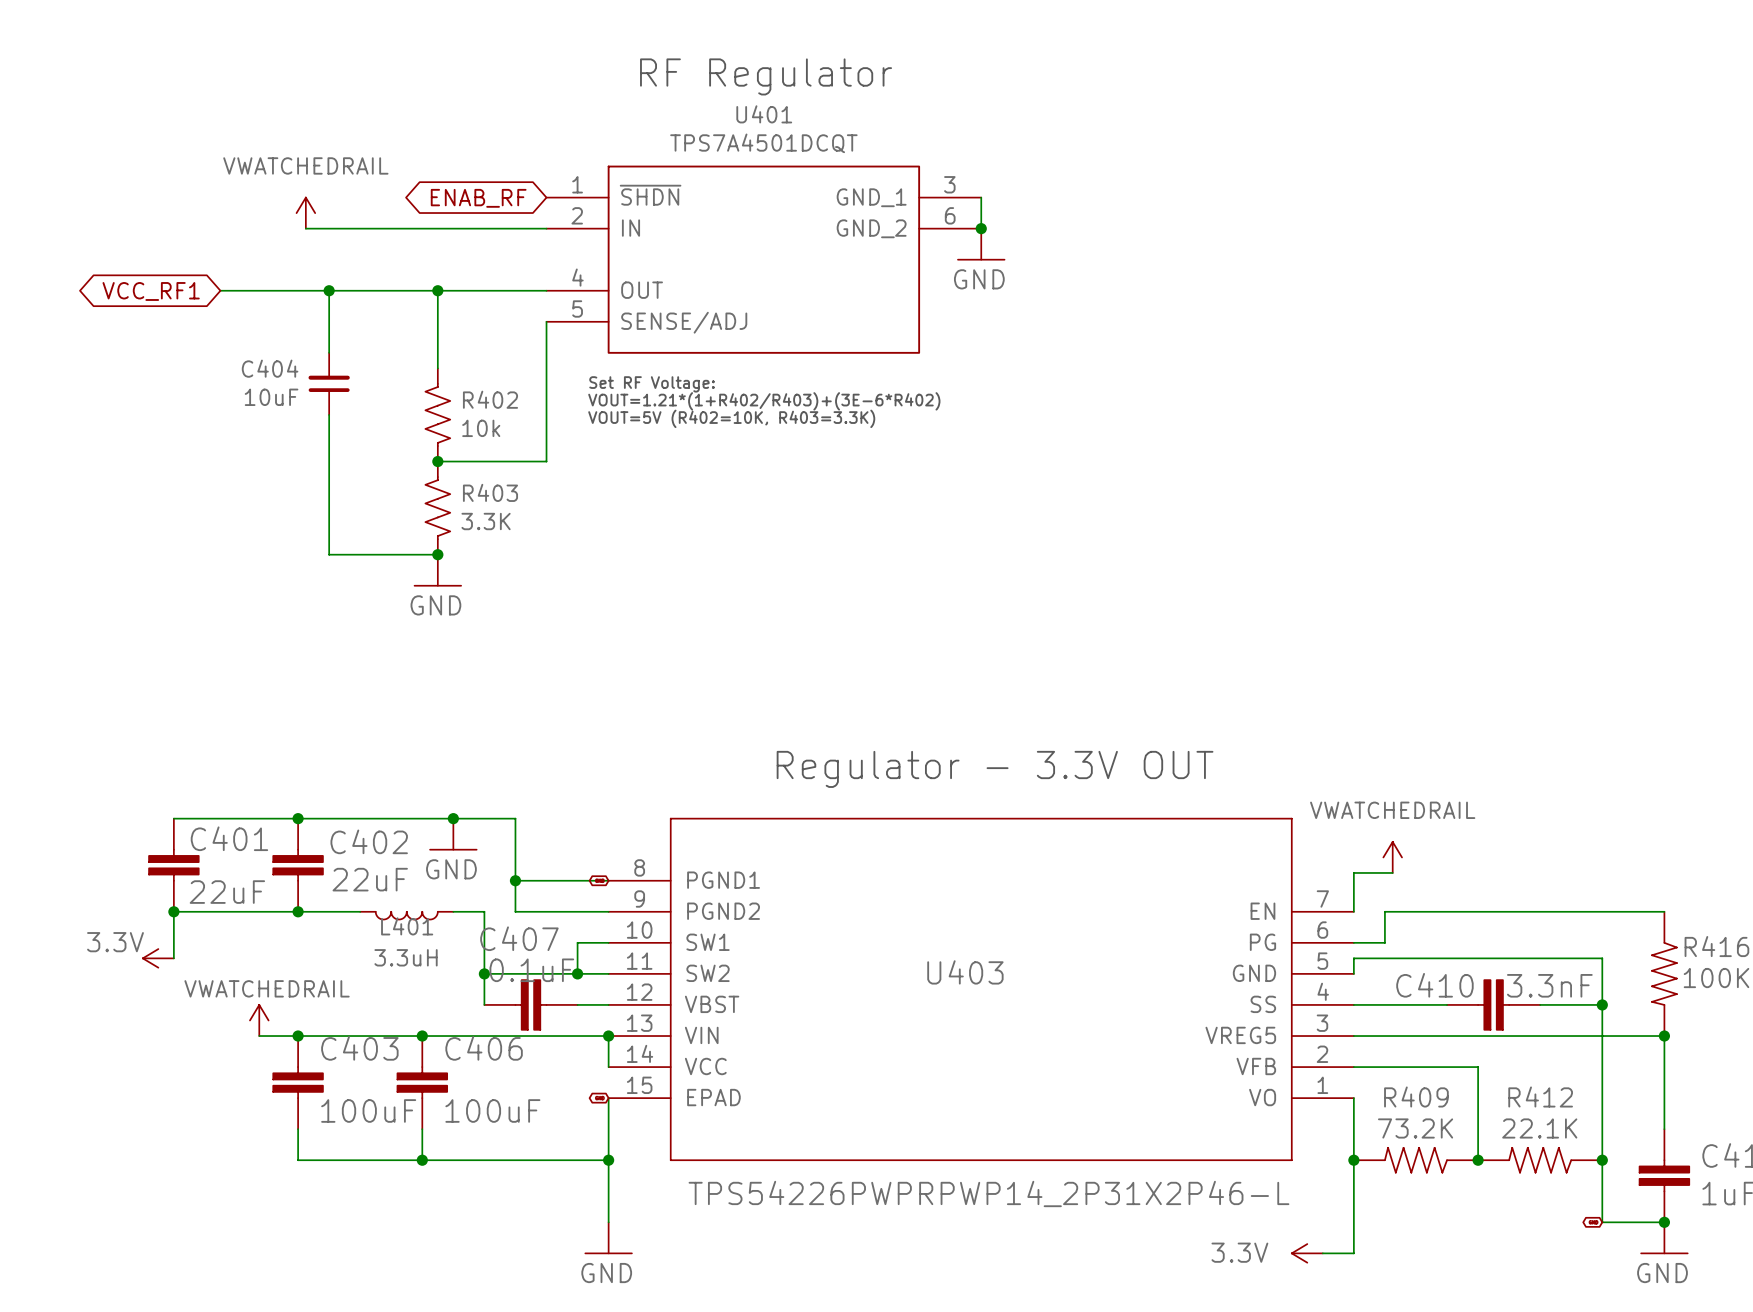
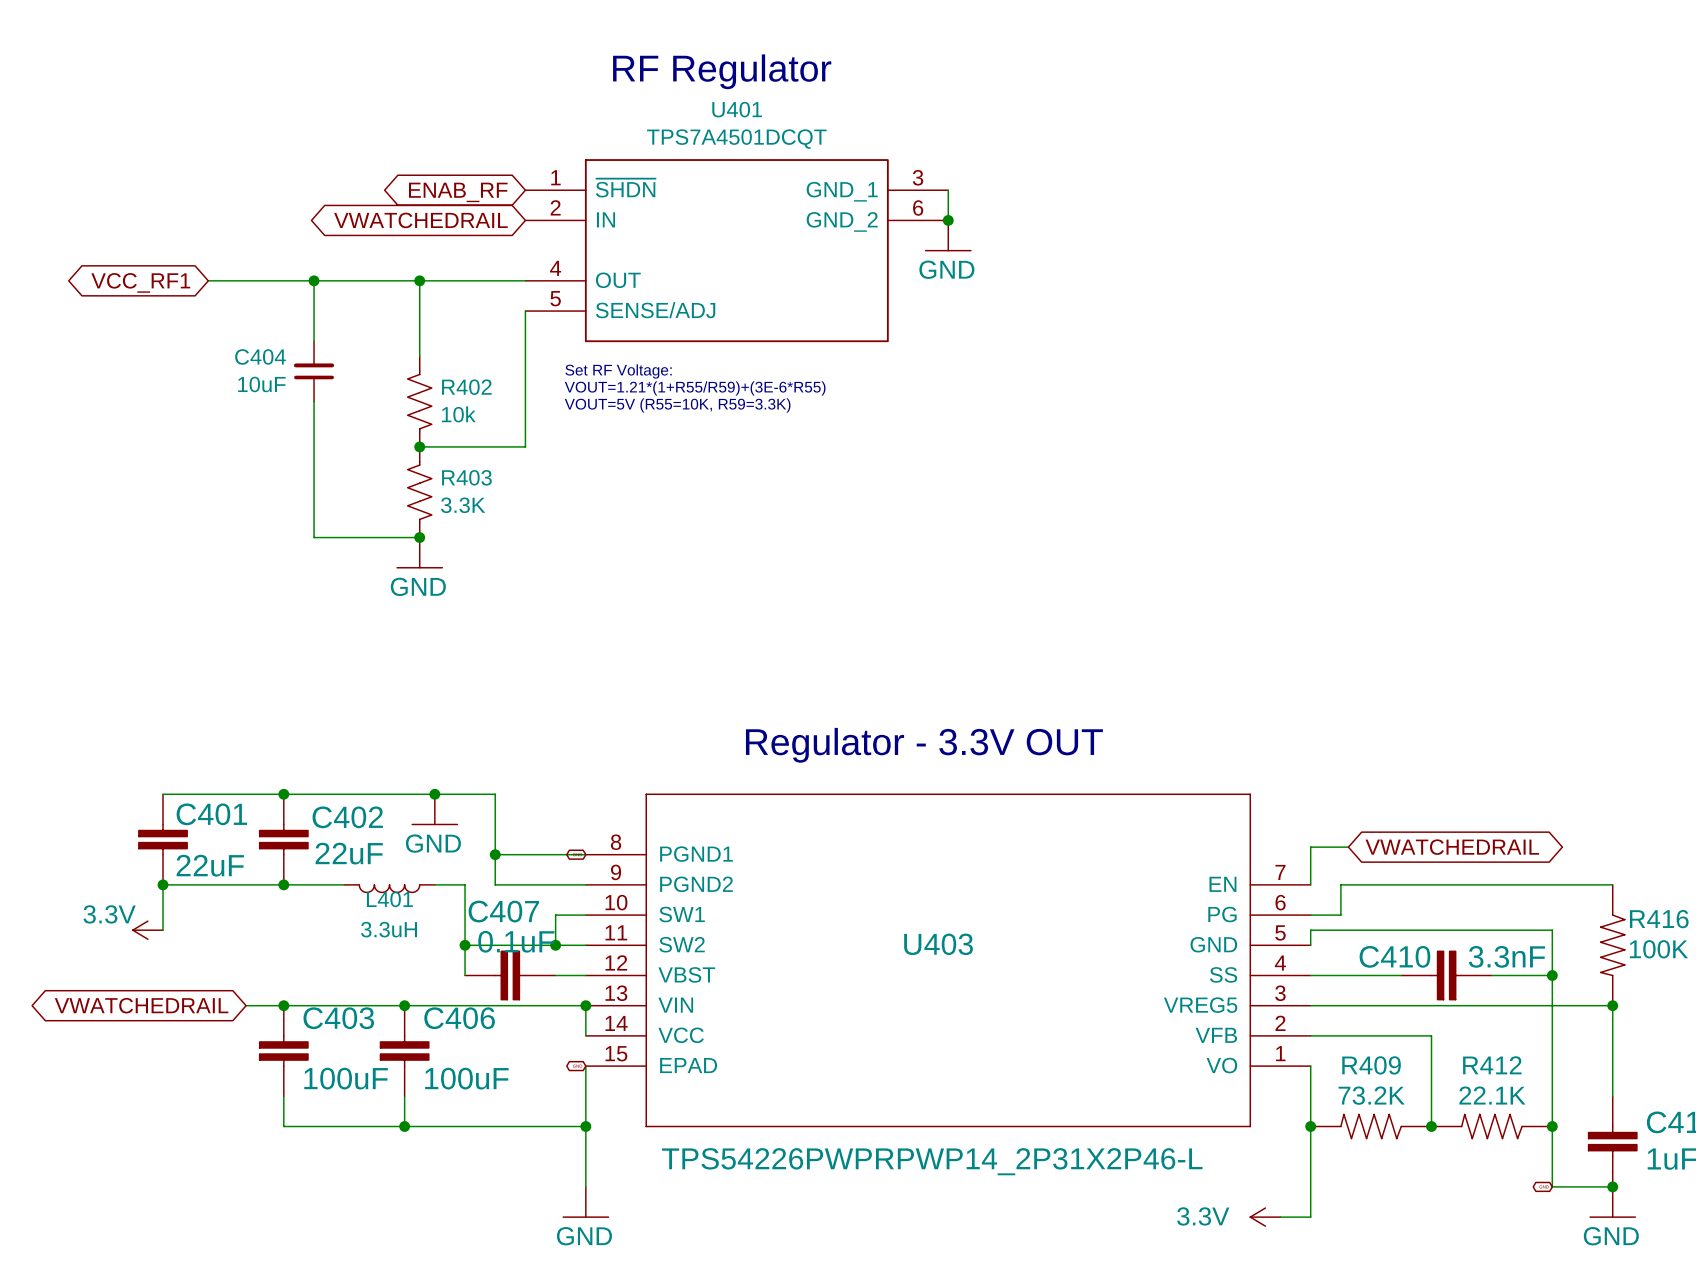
power symbol: VWATCHEDRAIL (305, 213) -> none
wire: (305, 228) (546, 228) -> none
global label: none -> VWATCHEDRAIL (420, 220)
text: VOUT=1.21*(1+R402/R403)+(3E-6*R402) (764, 401) -> VOUT=1.21*(1+R55/R59)+(3E-6*R55) (695, 388)
text: VOUT=5V (R402=10K, R403=3.3K) (731, 418) -> VOUT=5V (R55=10K, R59=3.3K) (677, 405)
power symbol: VWATCHEDRAIL (1392, 857) -> none
global label: none -> VWATCHEDRAIL (1452, 847)
power symbol: VWATCHEDRAIL (259, 1020) -> none
global label: none -> VWATCHEDRAIL (141, 1005)

